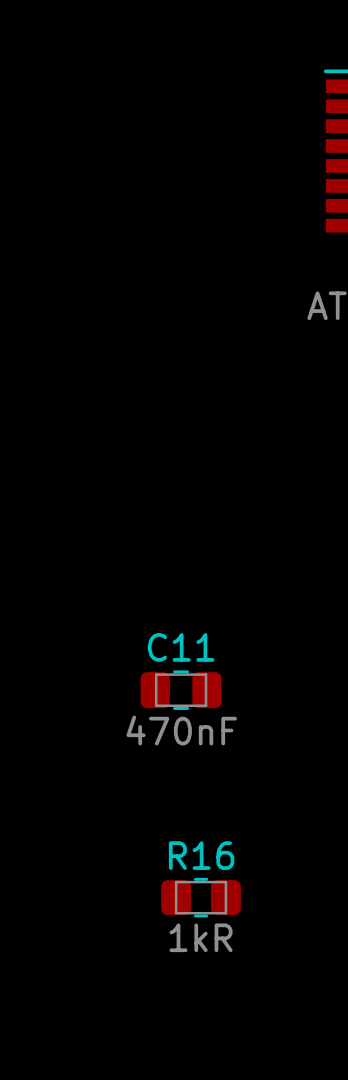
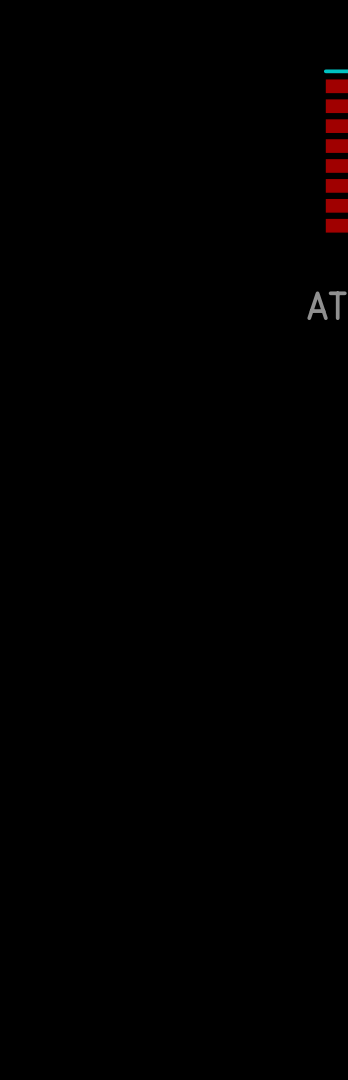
C11: 470nF (181, 690) -> none
R16: 1kR (201, 897) -> none

